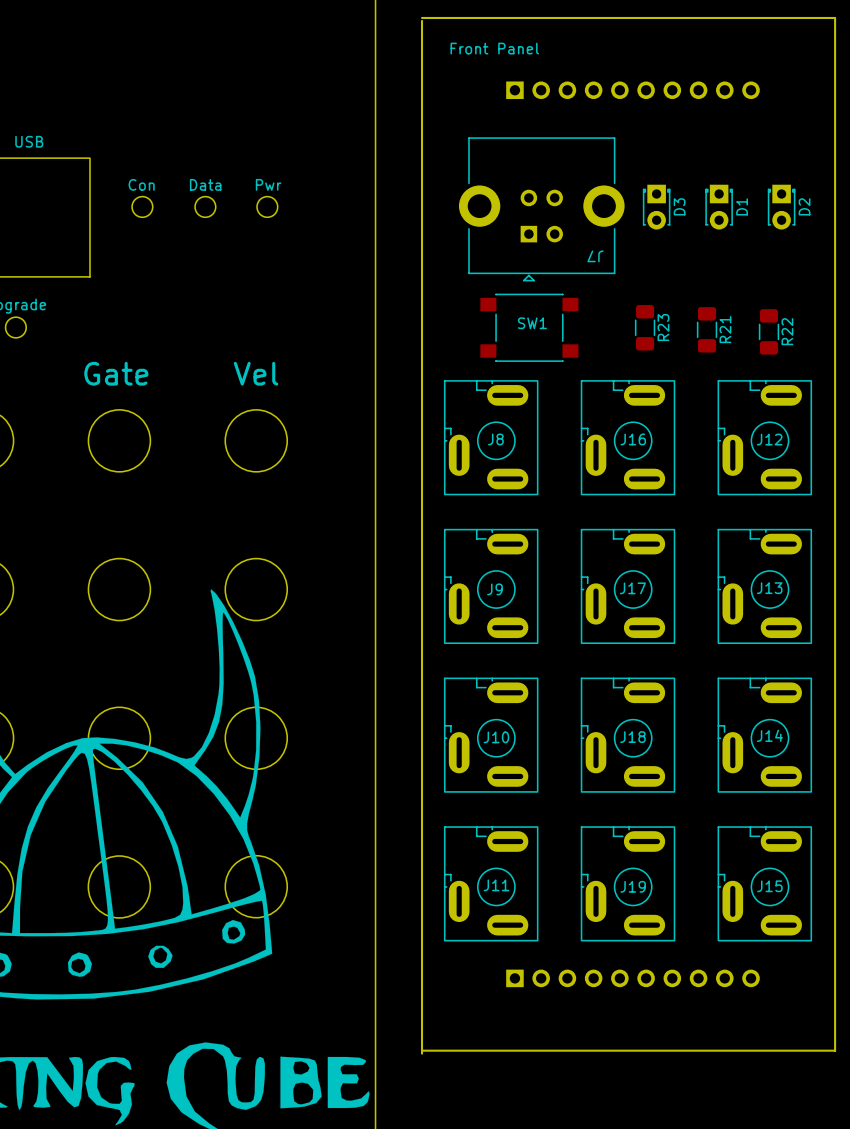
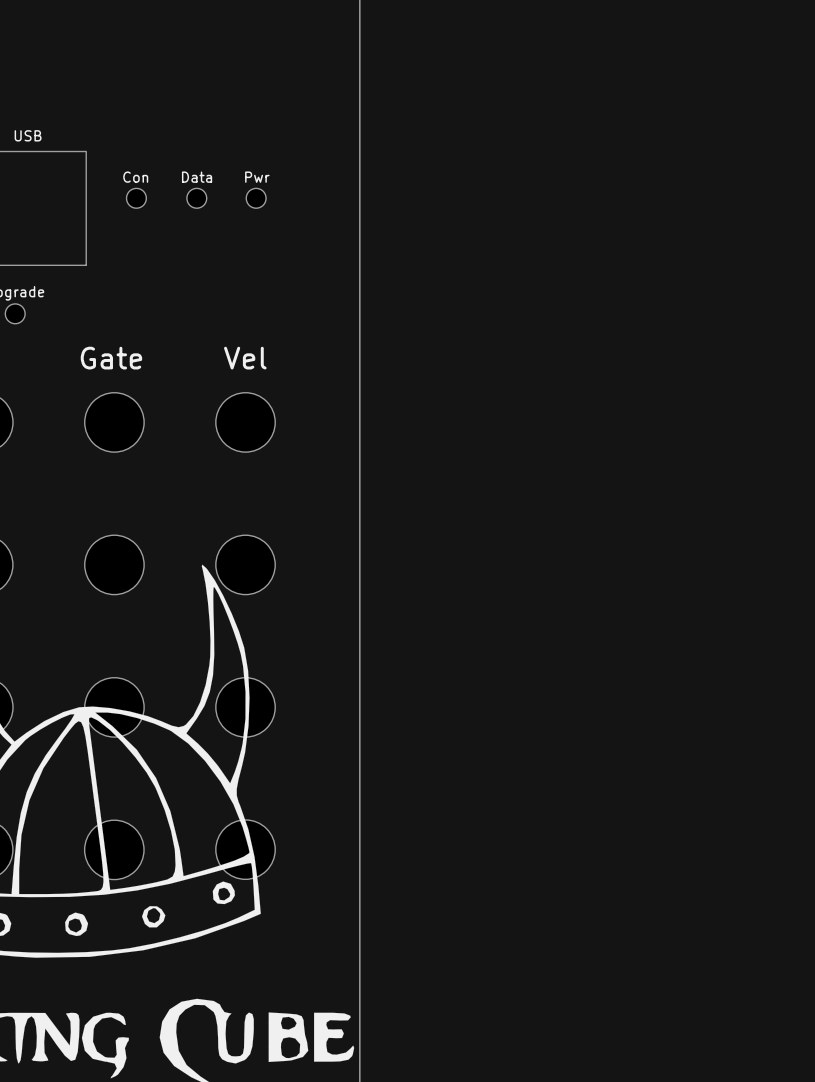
board edge: (422, 17) (835, 17) (835, 1050) (422, 1050) -> none
board edge: (422, 20) (422, 1053) -> none
text: Front Panel (494, 48) -> none
part: (632, 90) -> none
D3: (656, 207) -> none
D1: (719, 207) -> none
D2: (781, 207) -> none
J7: (541, 209) -> none
SW1: (529, 327) -> none
R23: (645, 327) -> none
R21: (707, 329) -> none
R22: (768, 331) -> none
J8: (491, 437) -> none
J16: (628, 437) -> none
J12: (764, 437) -> none
J9: (491, 586) -> none
J17: (628, 586) -> none
J13: (764, 586) -> none
J10: (491, 735) -> none
J18: (628, 735) -> none
J14: (764, 735) -> none
J11: (491, 883) -> none
J19: (628, 883) -> none
J15: (764, 883) -> none
part: (632, 978) -> none

